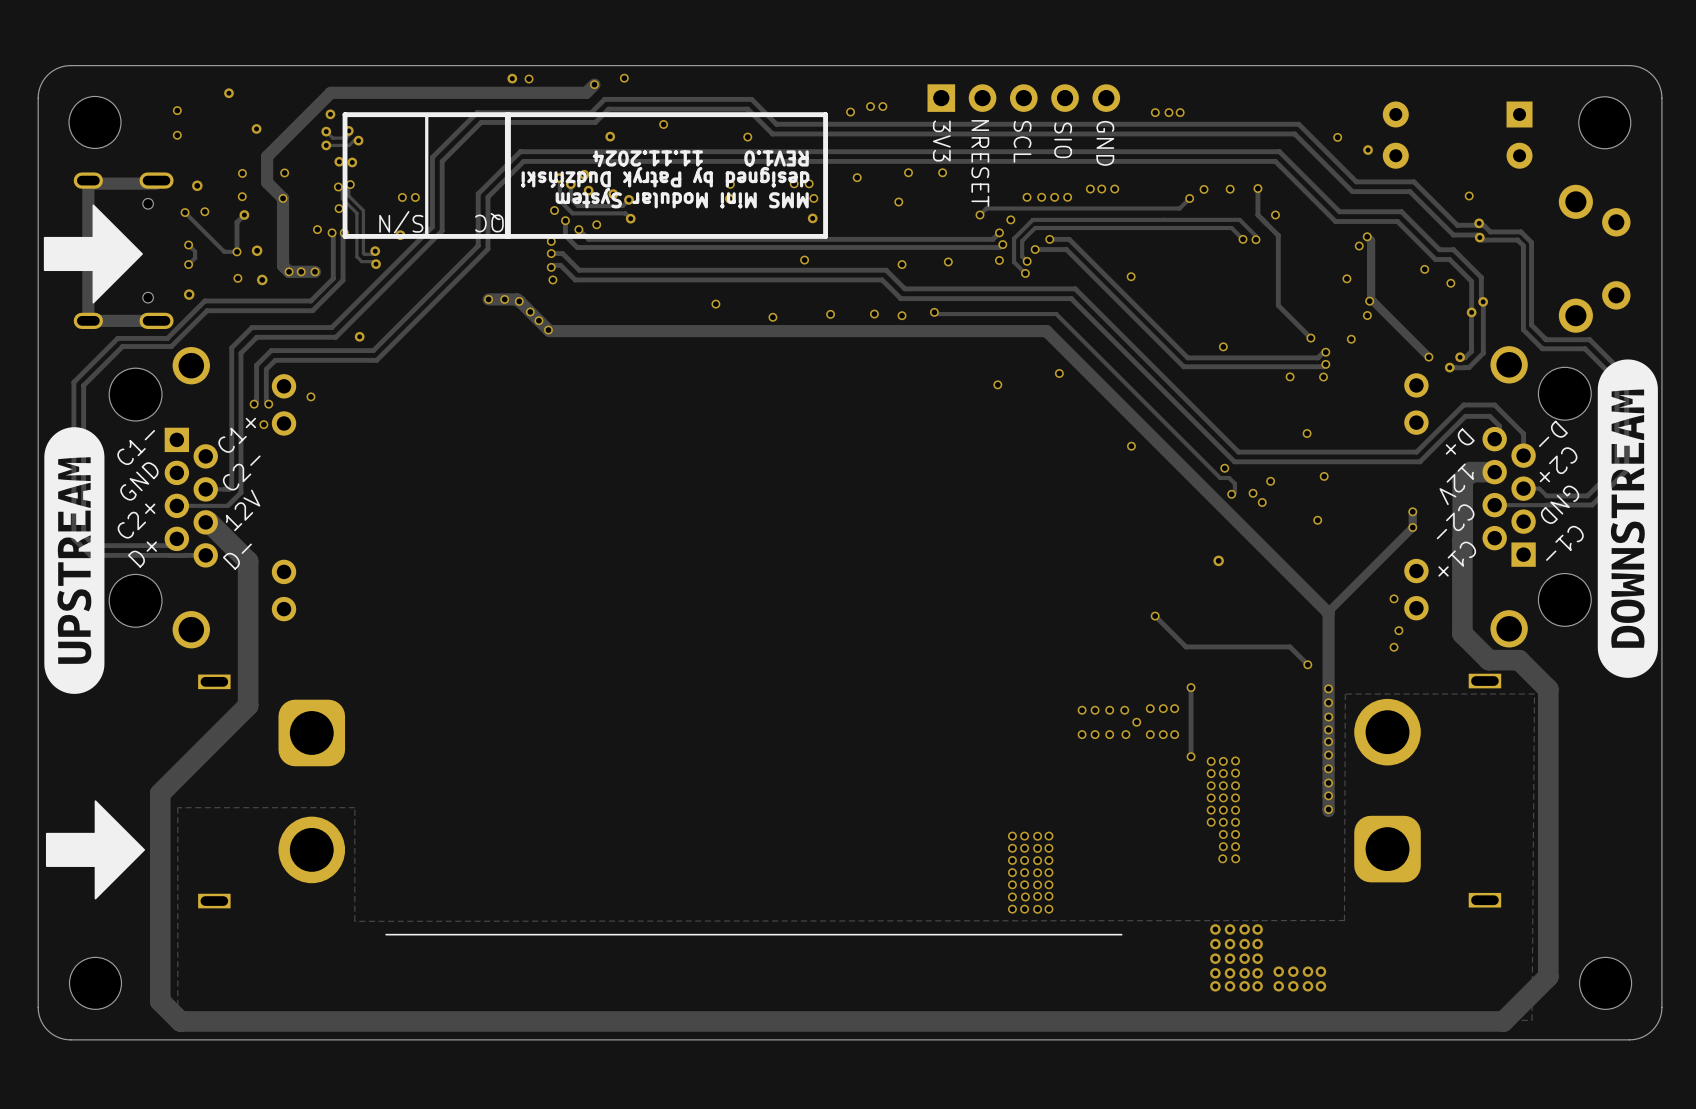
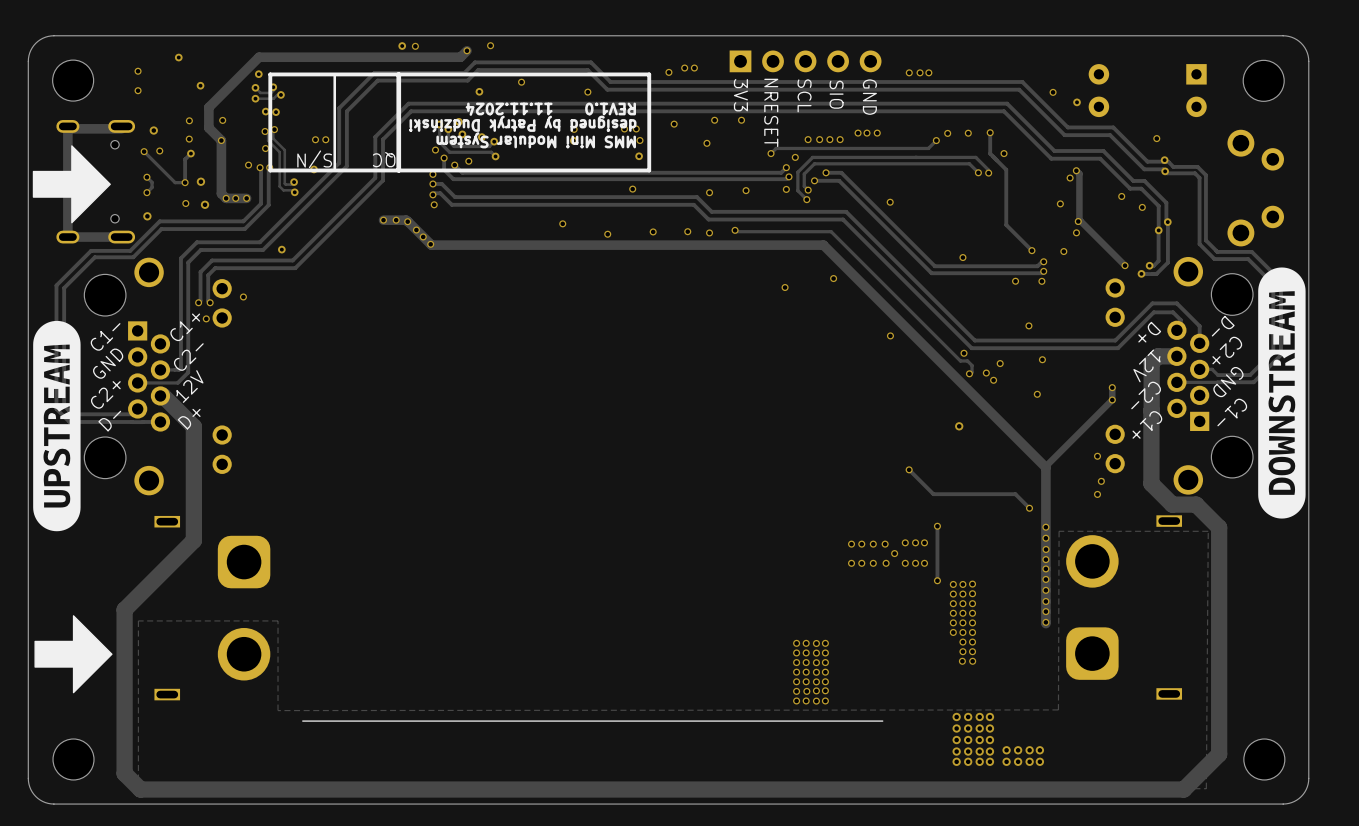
text: D+ (142, 554) -> D- (109, 421)
text: D- (237, 556) -> D+ (189, 419)

